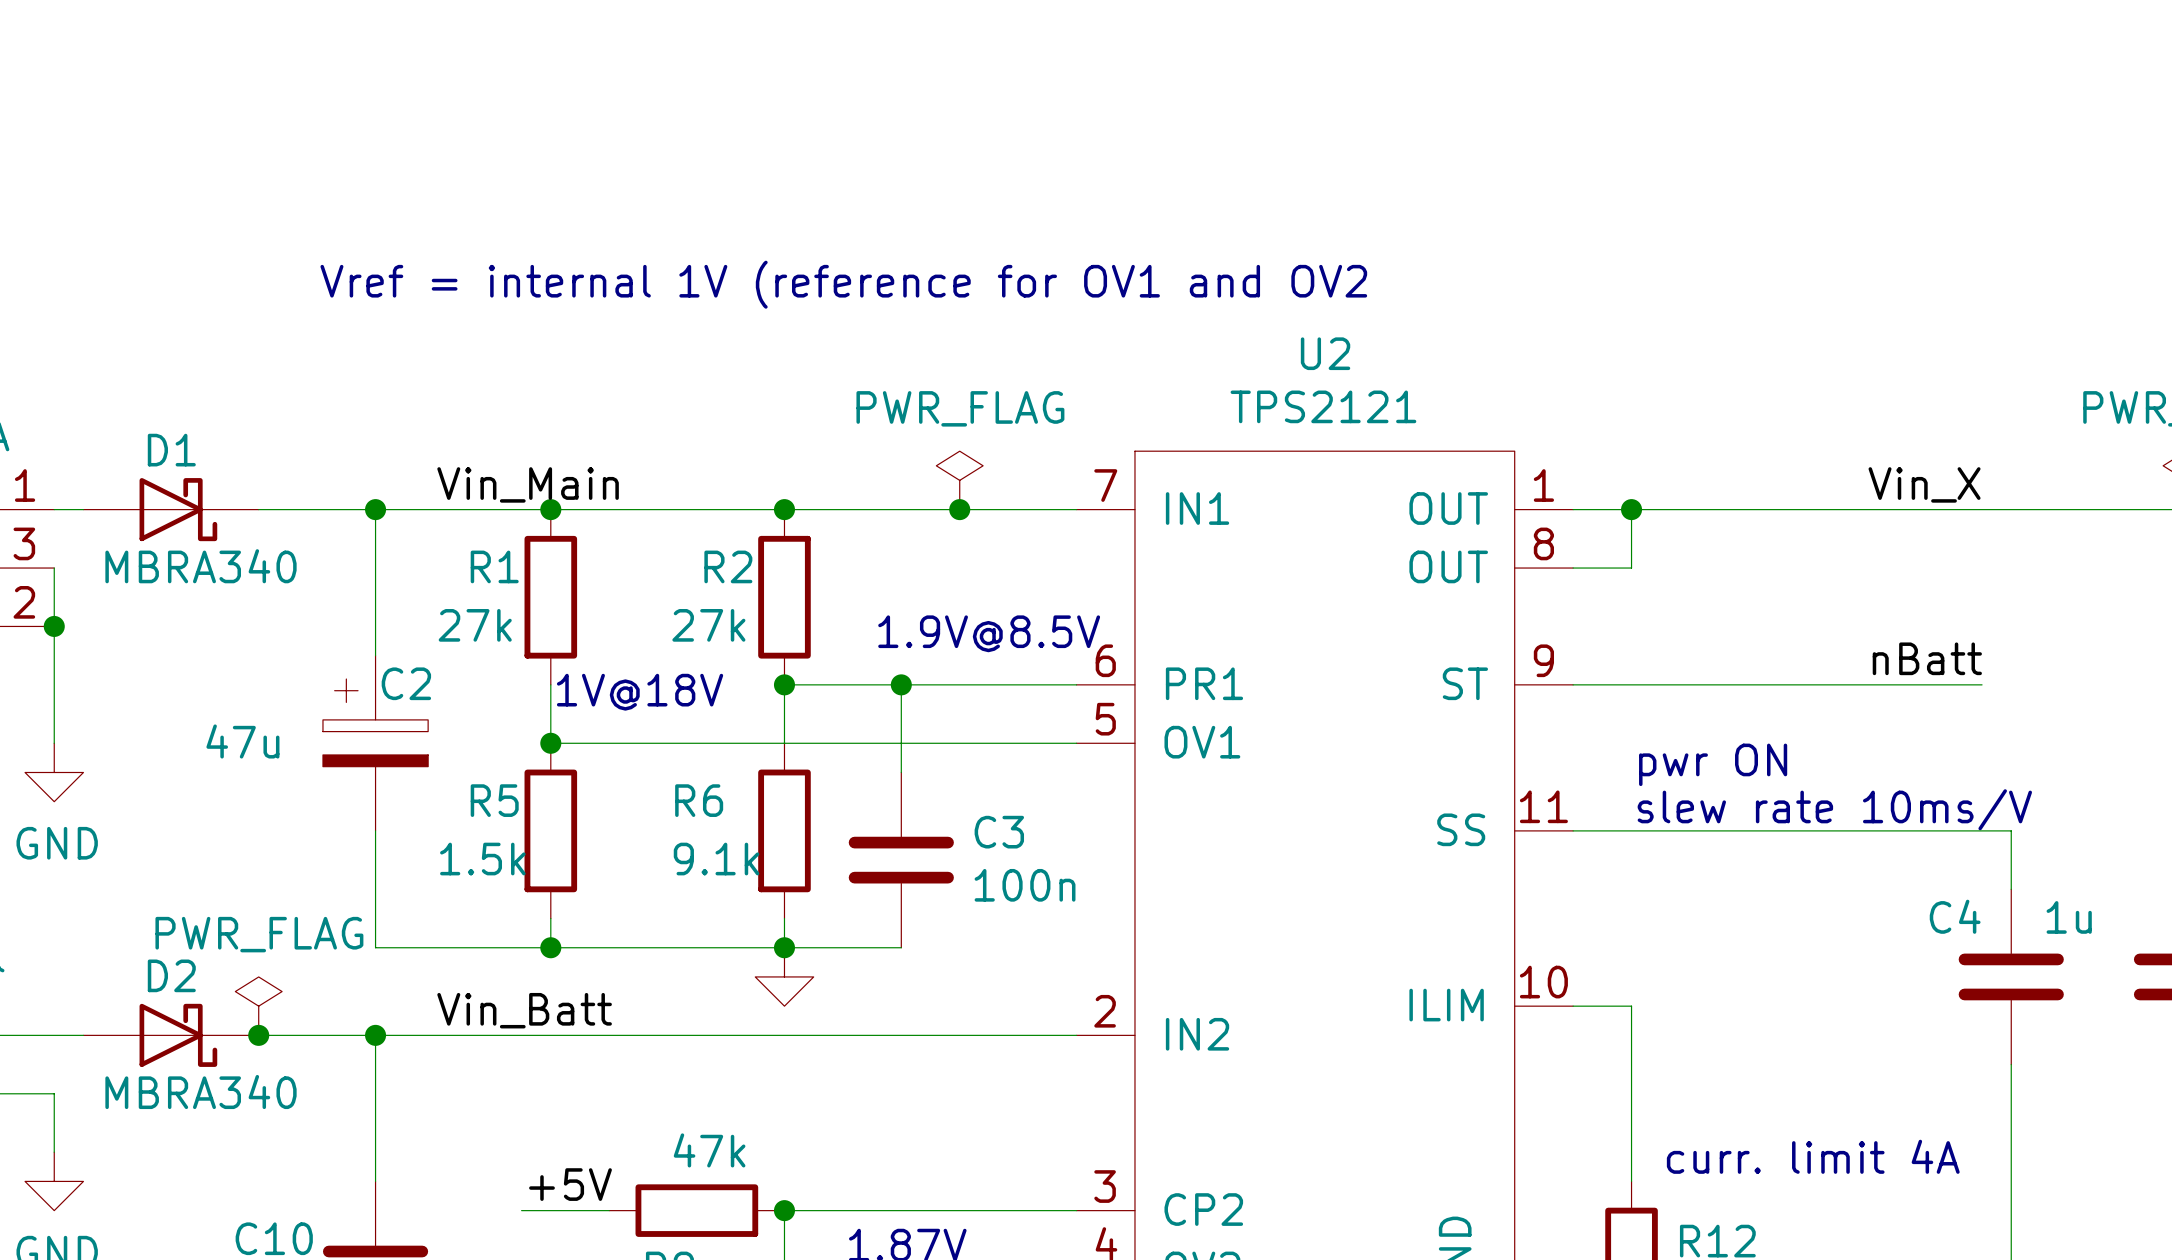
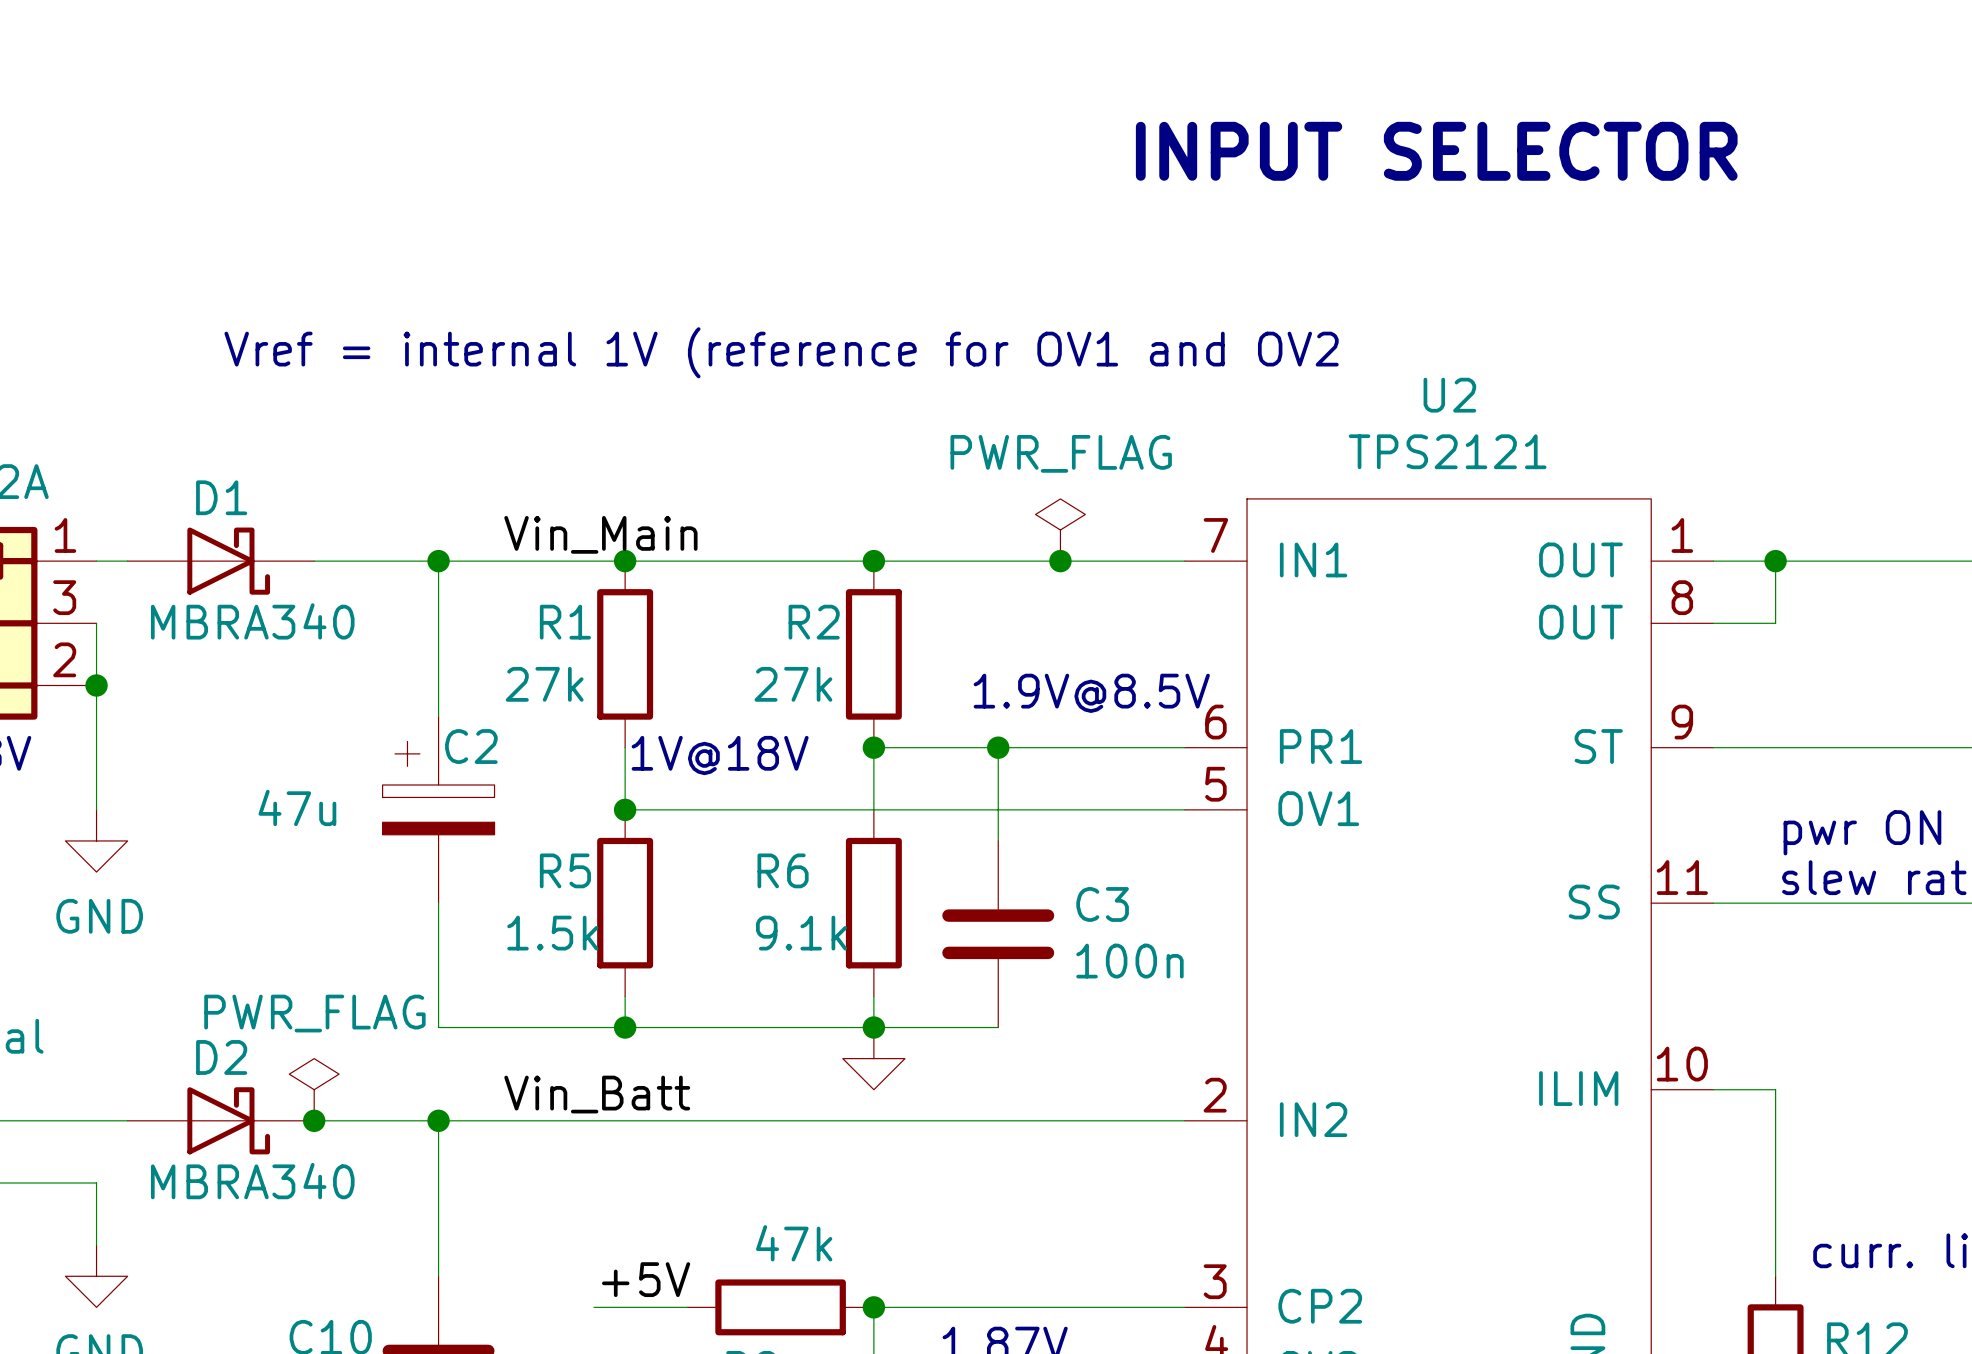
text: none -> INPUT SELECTOR (1436, 151)
text position: Vref = internal 1V (reference for OV1 and OV2 (843, 284) -> Vref = internal 1V (reference for OV1 and OV2 (781, 352)

